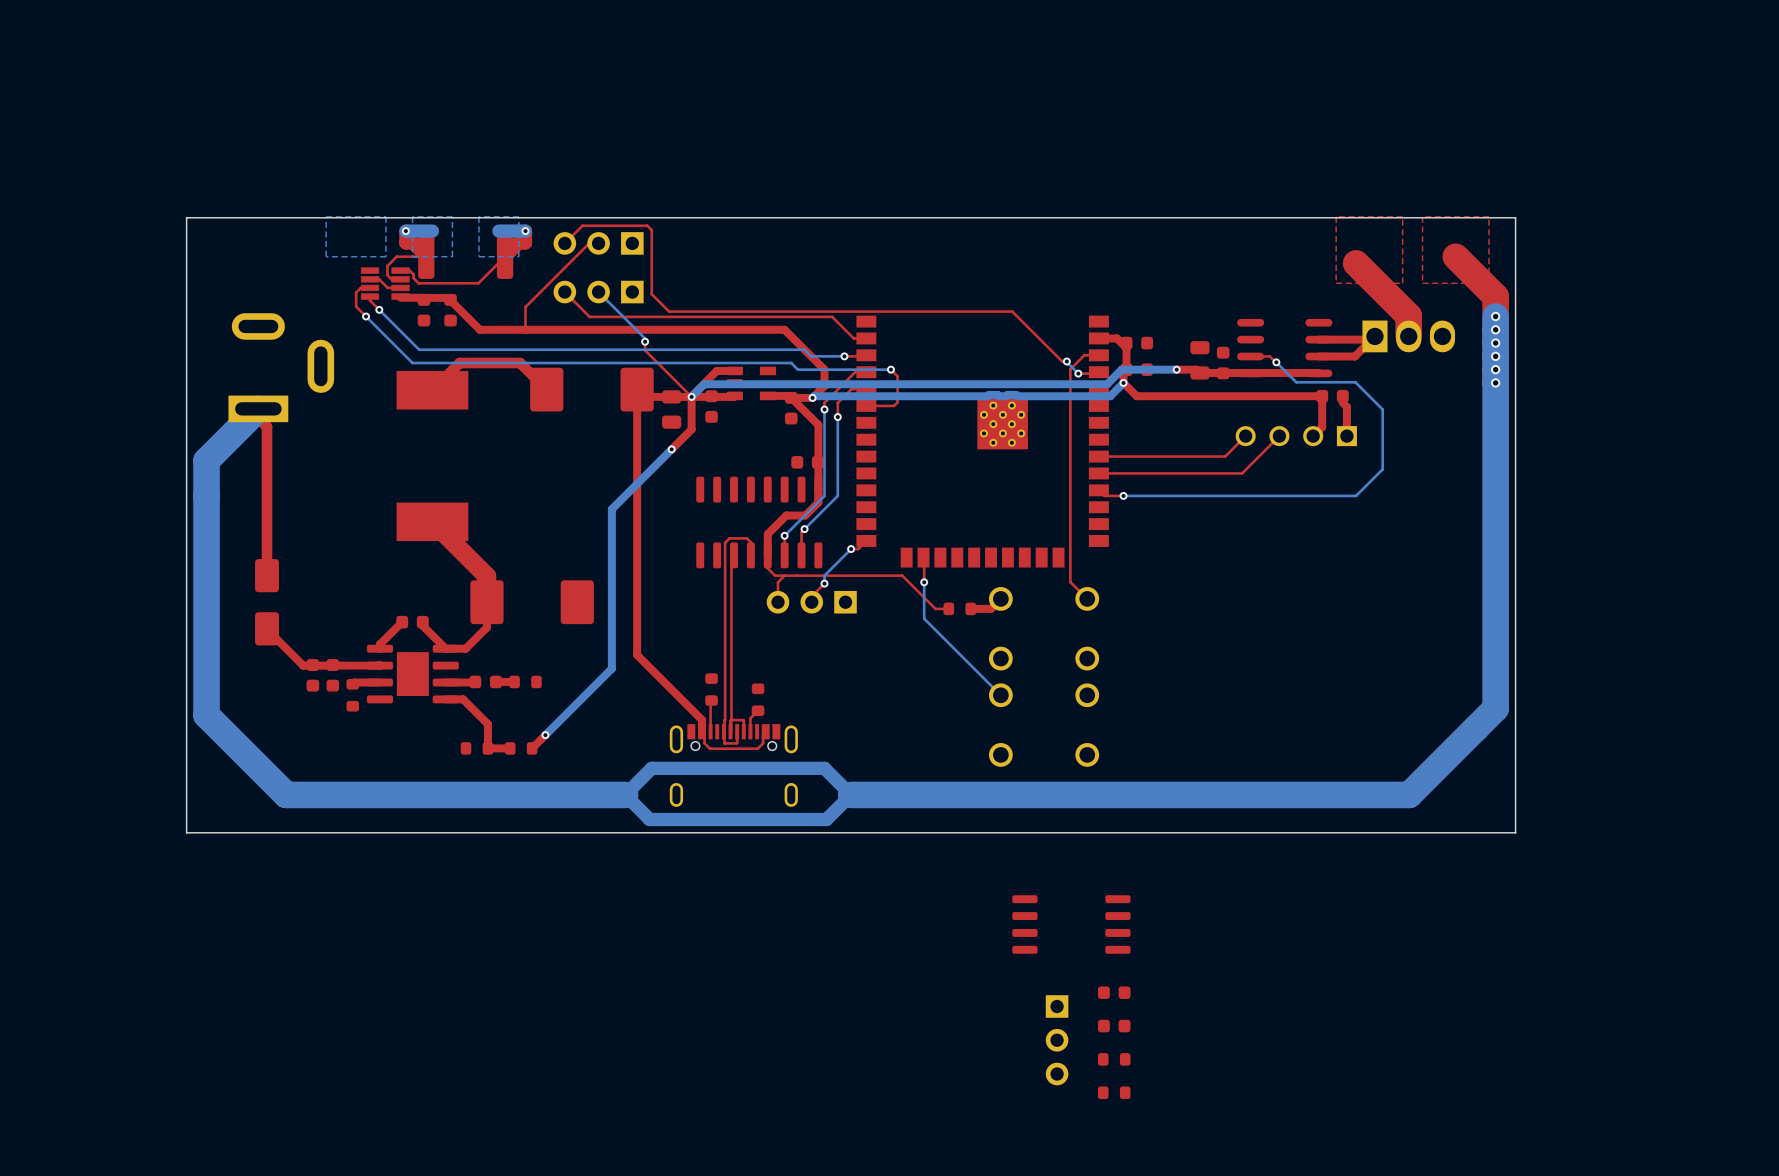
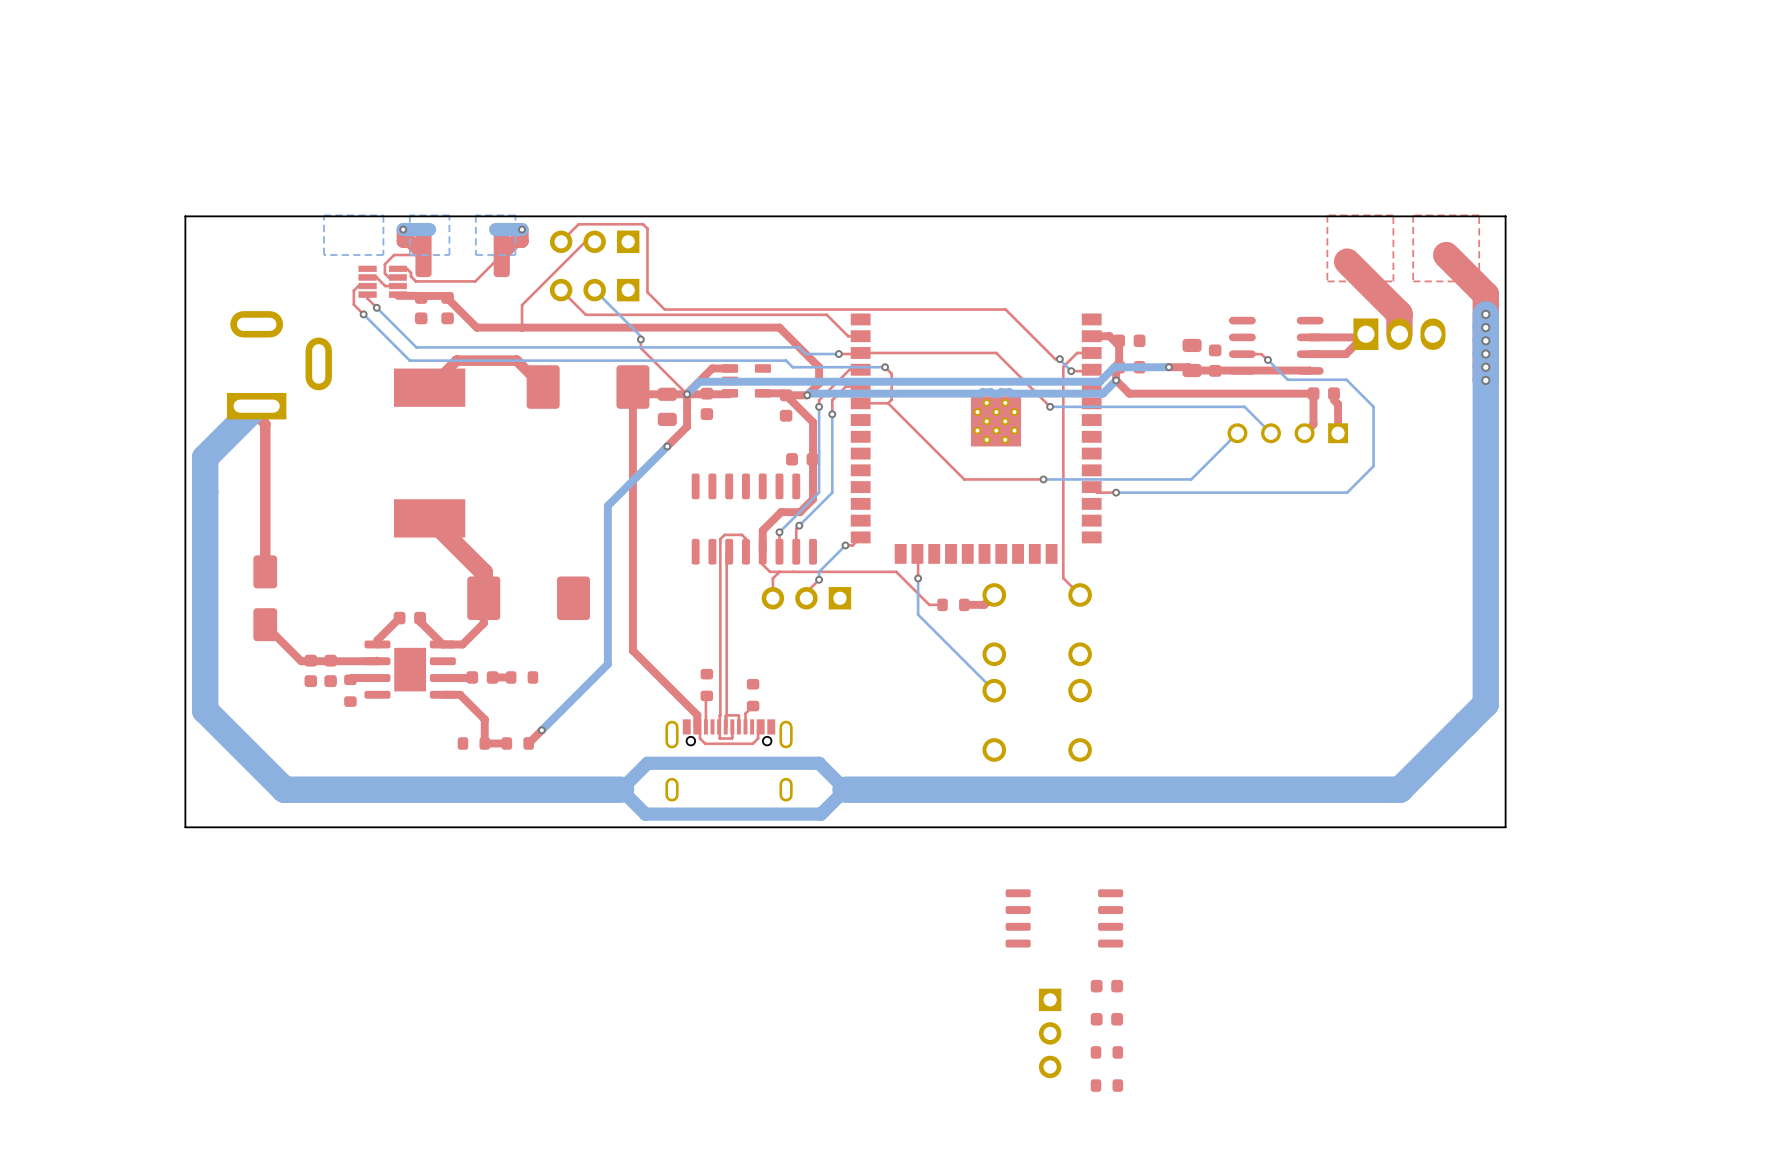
top track: none -> (860, 352) (996, 352) (1050, 406)
top track: none -> (888, 403) (964, 479) (1043, 479)
bottom track: none -> (1050, 406) (1244, 406) (1271, 433)
via: none -> (1050, 406)
top track: (1245, 436) (1225, 456) (1098, 456) -> none
bottom track: none -> (1237, 433) (1191, 479) (1043, 479)
top track: (1279, 436) (1242, 473) (1098, 473) -> none
via: none -> (1043, 479)

